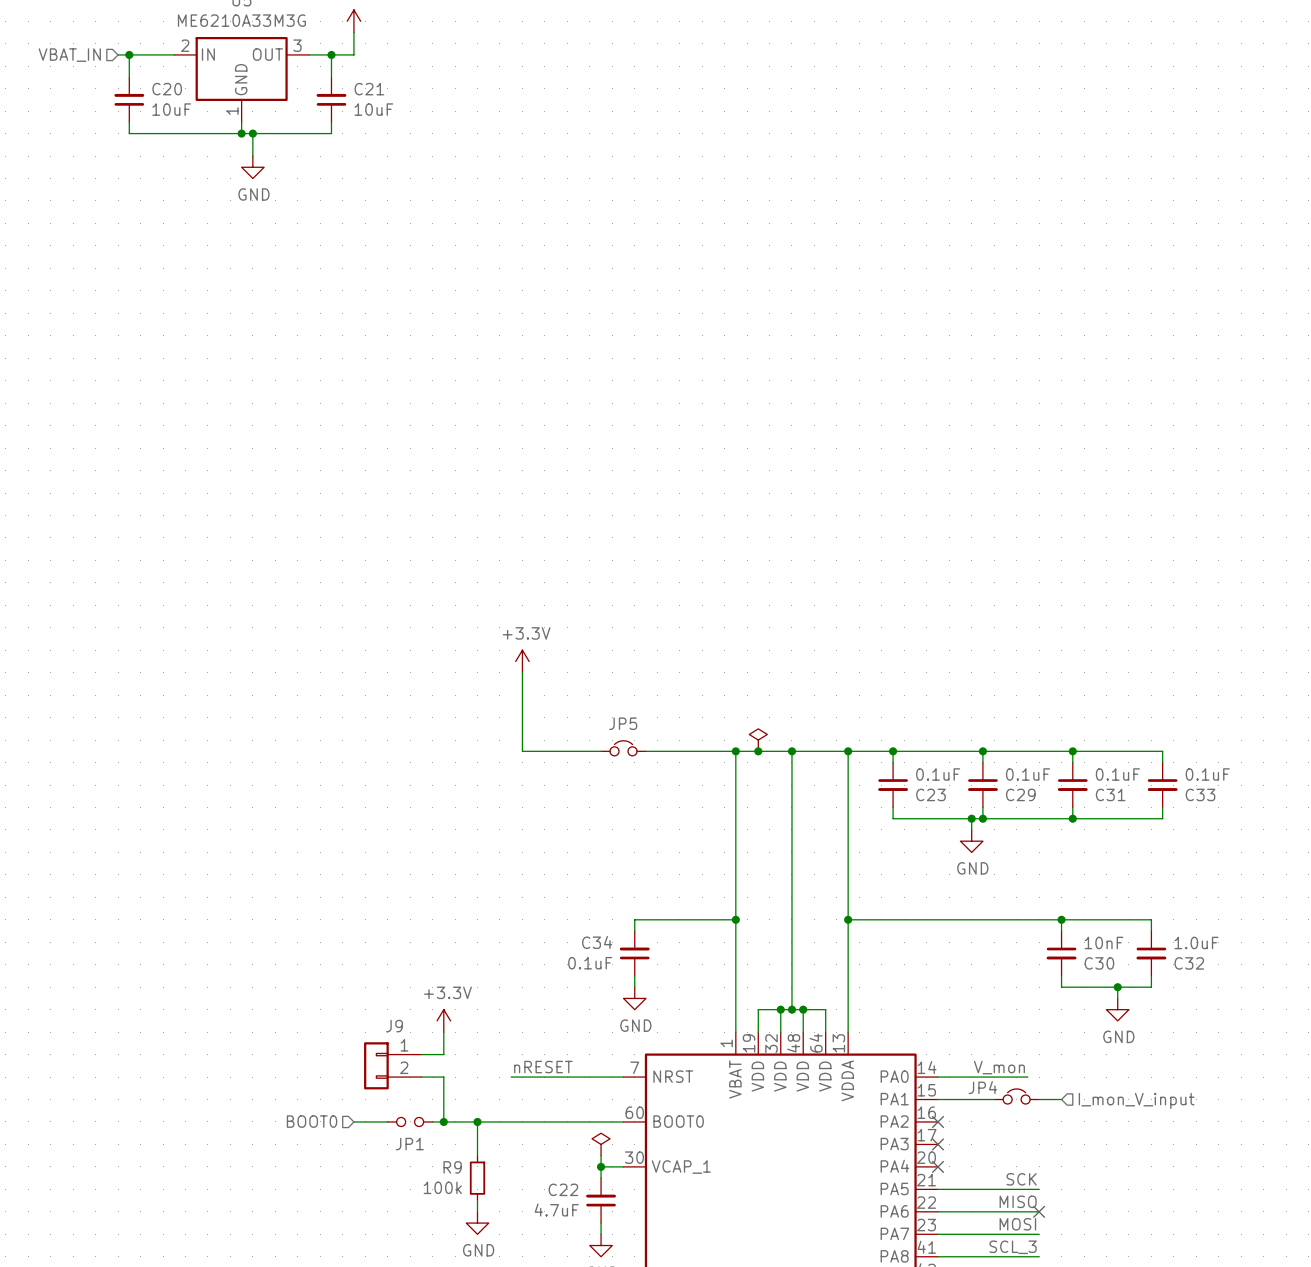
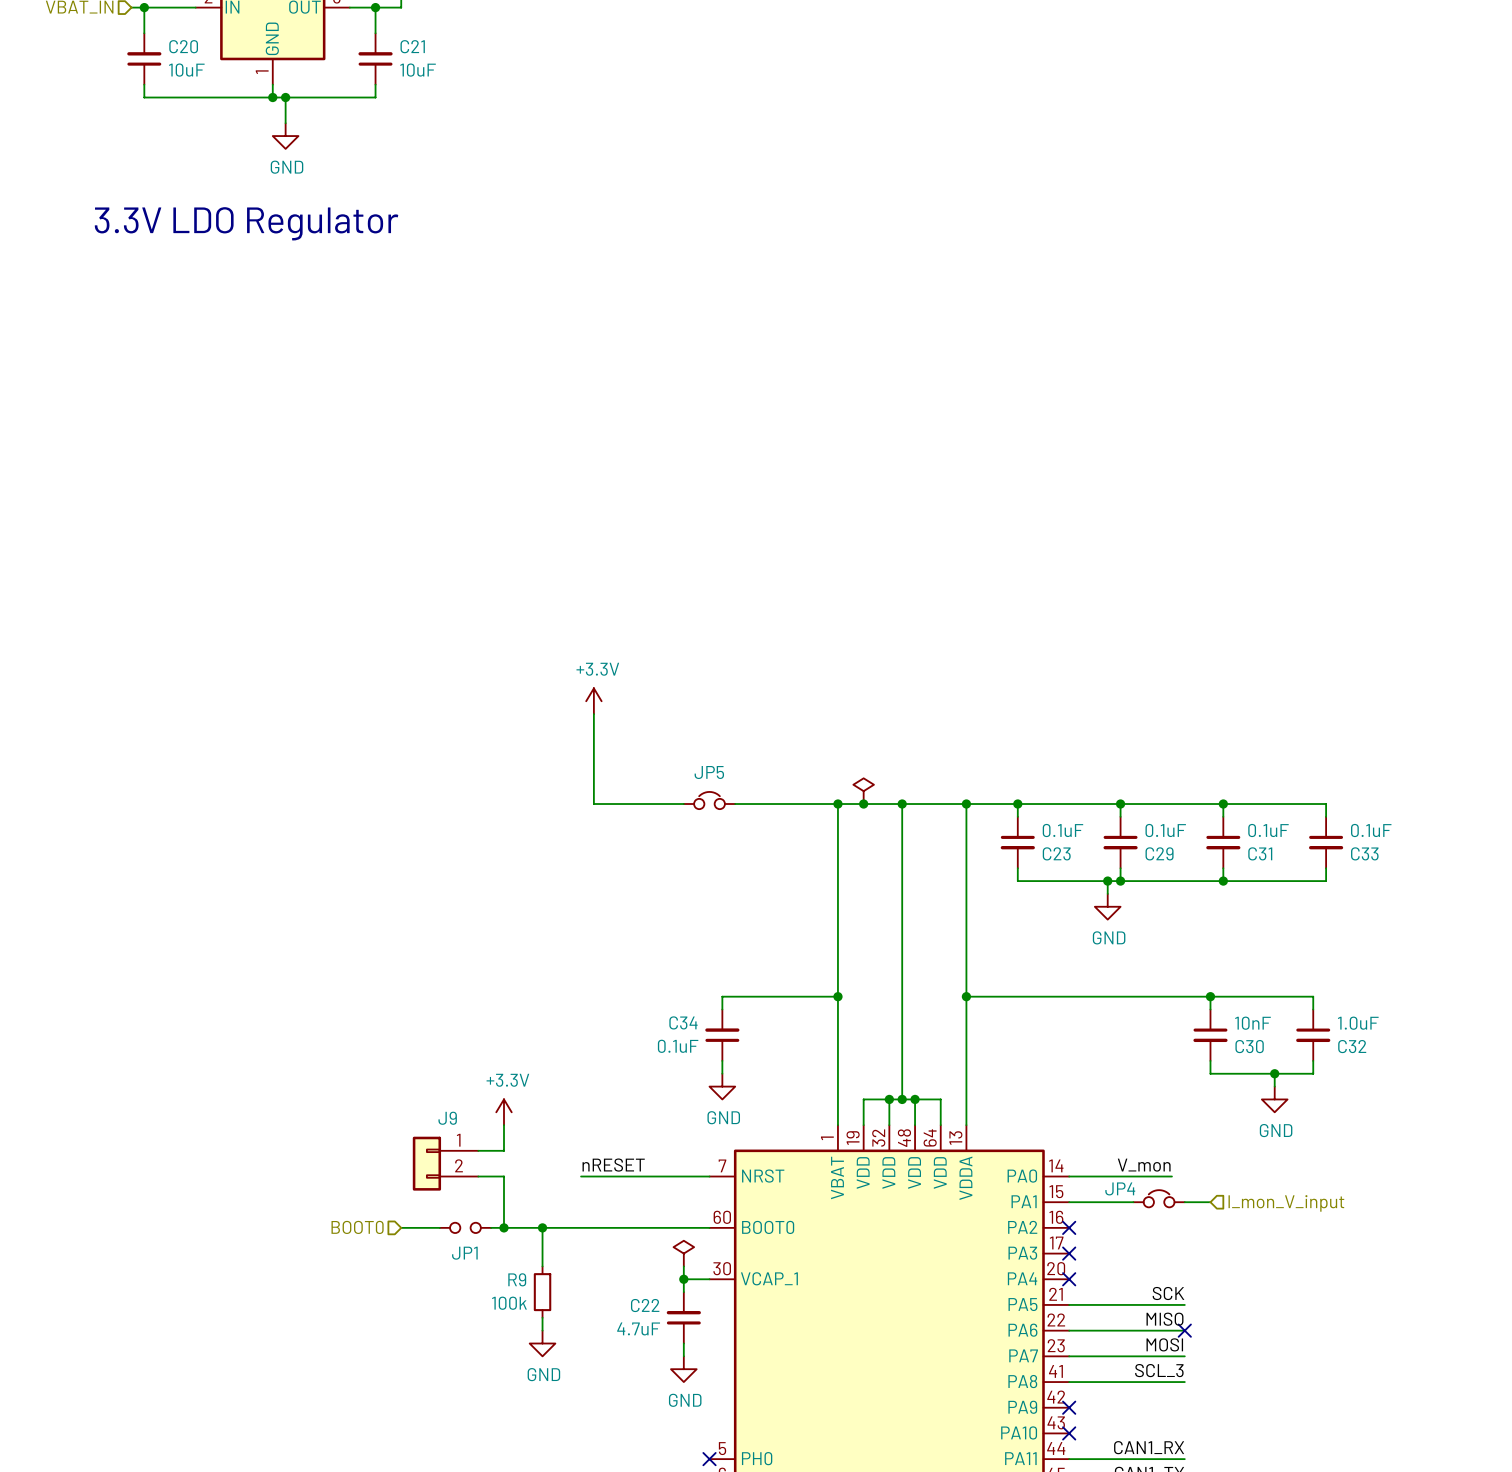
text: none -> 3.3V LDO Regulator (246, 223)

